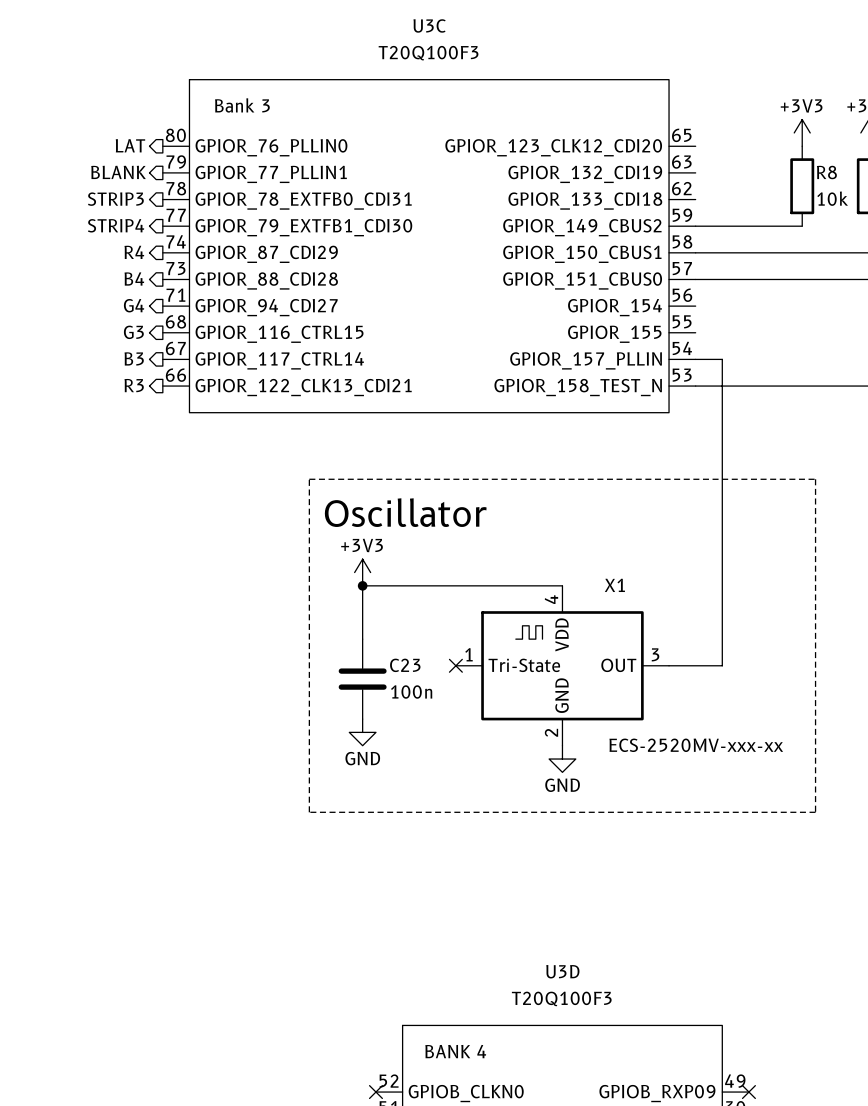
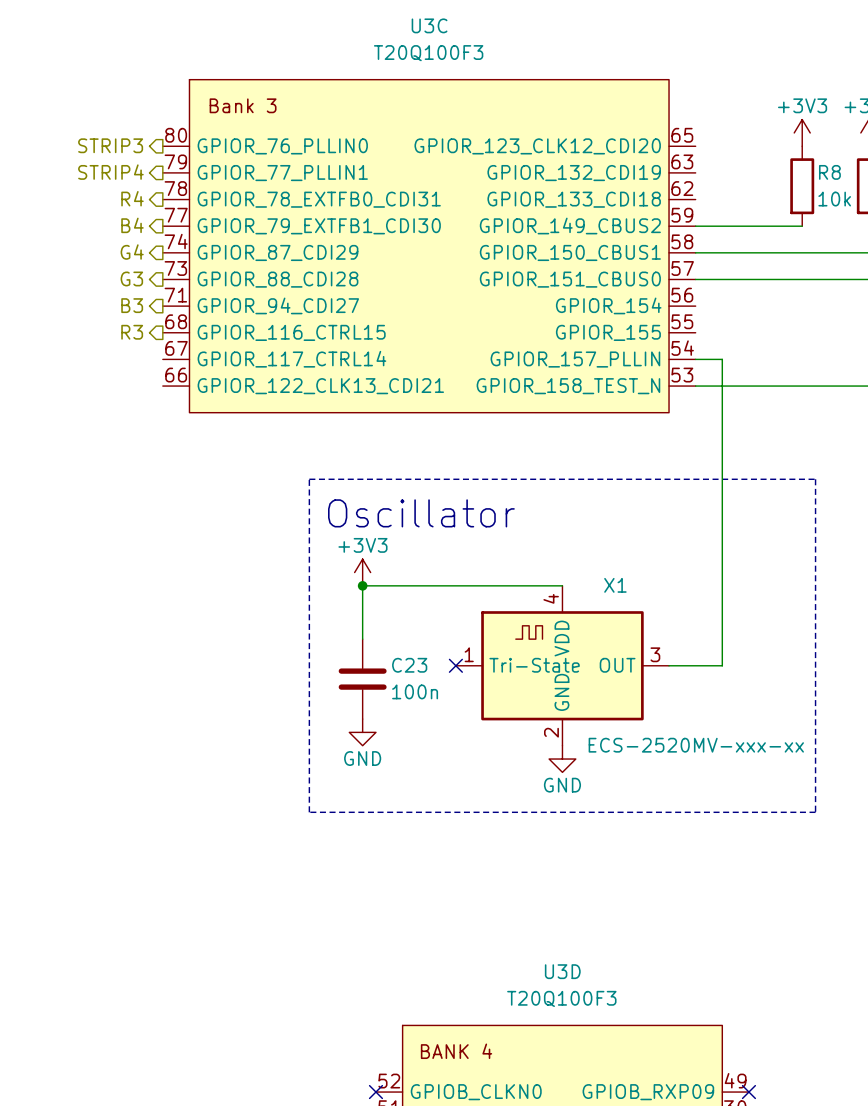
hierarchical label: LAT (130, 145) -> STRIP3 (110, 145)
hierarchical label: BLANK (118, 172) -> STRIP4 (110, 172)
hierarchical label: STRIP3 (115, 199) -> R4 (132, 198)
hierarchical label: STRIP4 (116, 225) -> B4 (132, 225)
hierarchical label: R4 (134, 252) -> G4 (132, 252)
hierarchical label: B4 (134, 278) -> G3 (131, 278)
hierarchical label: G4 (134, 305) -> B3 (132, 305)
hierarchical label: G3 (133, 332) -> R3 (132, 332)
hierarchical label: B3 (134, 358) -> none
hierarchical label: R3 (134, 385) -> none

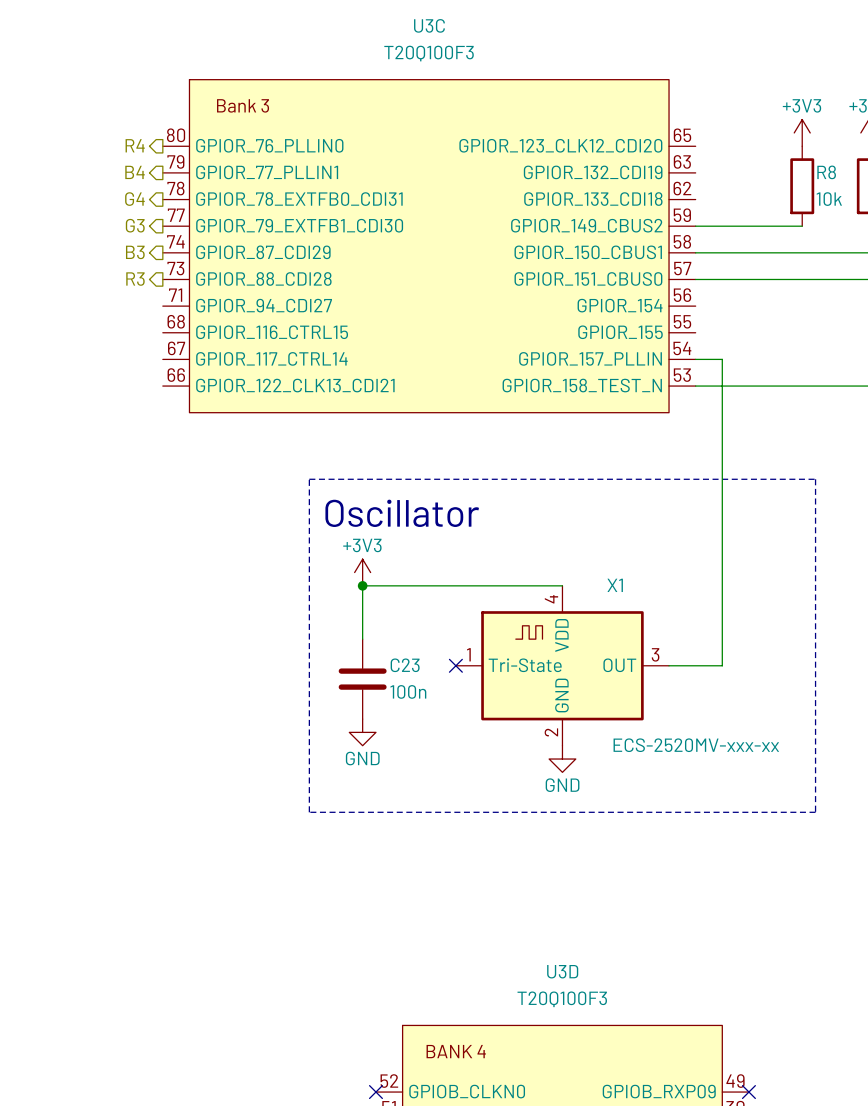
hierarchical label: STRIP3 (110, 145) -> R4 (135, 145)
hierarchical label: STRIP4 (110, 172) -> B4 (135, 172)
hierarchical label: R4 (132, 198) -> G4 (134, 199)
hierarchical label: B4 (132, 225) -> G3 (135, 225)
hierarchical label: G4 (132, 252) -> B3 (135, 252)
hierarchical label: G3 (131, 278) -> R3 (135, 279)
hierarchical label: B3 (132, 305) -> none
hierarchical label: R3 (132, 332) -> none

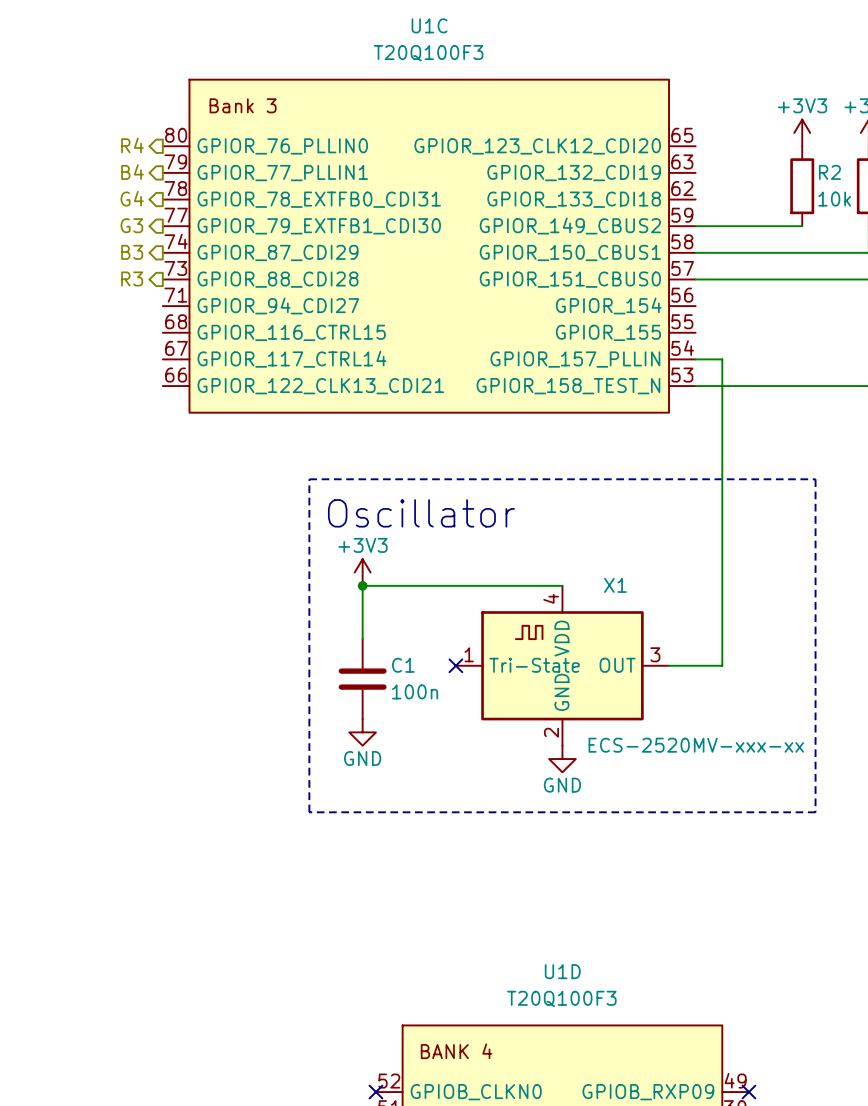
U3C name: U3C (429, 25) -> U1C (429, 25)
R8 name: R8 (826, 172) -> R2 (829, 172)
C23 name: C23 (405, 665) -> C1 (403, 665)
U3D name: U3D (562, 971) -> U1D (562, 971)

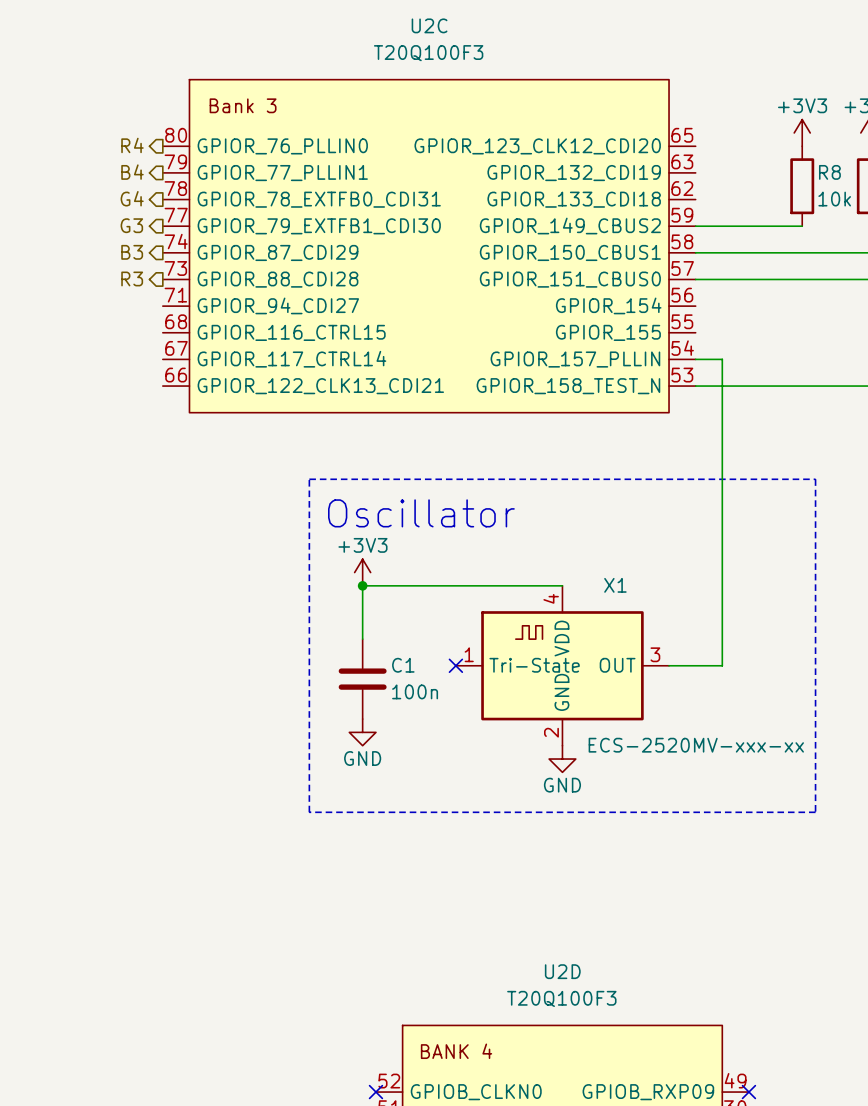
U1C name: U1C (429, 25) -> U2C (429, 25)
R2 name: R2 (829, 172) -> R8 (829, 172)
U1D name: U1D (562, 971) -> U2D (562, 971)

